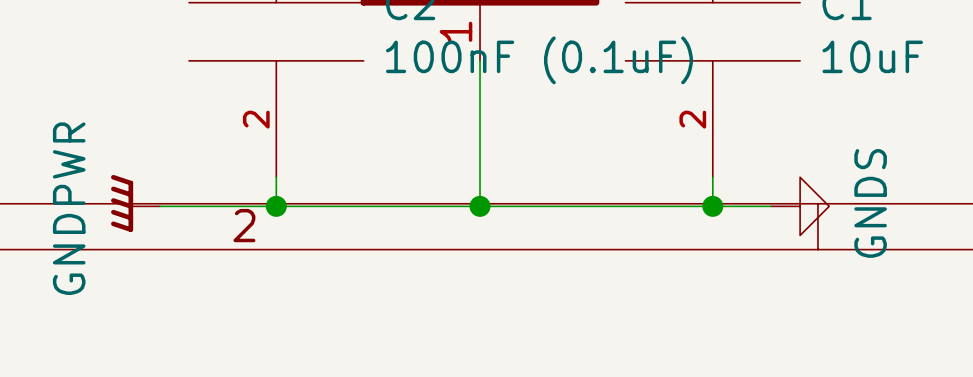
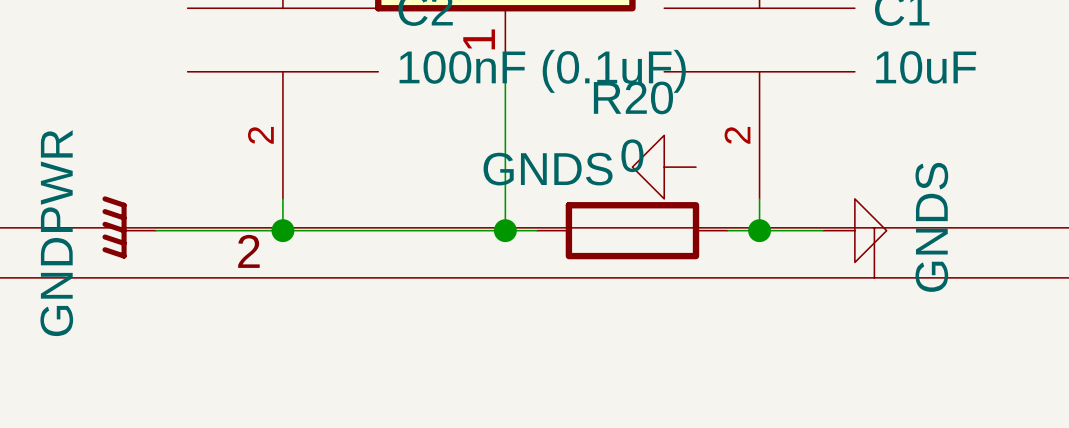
power symbol: none -> GNDS (664, 167)
wire: (509, 206) (683, 206) -> none
R20: none -> 0 (632, 230)

